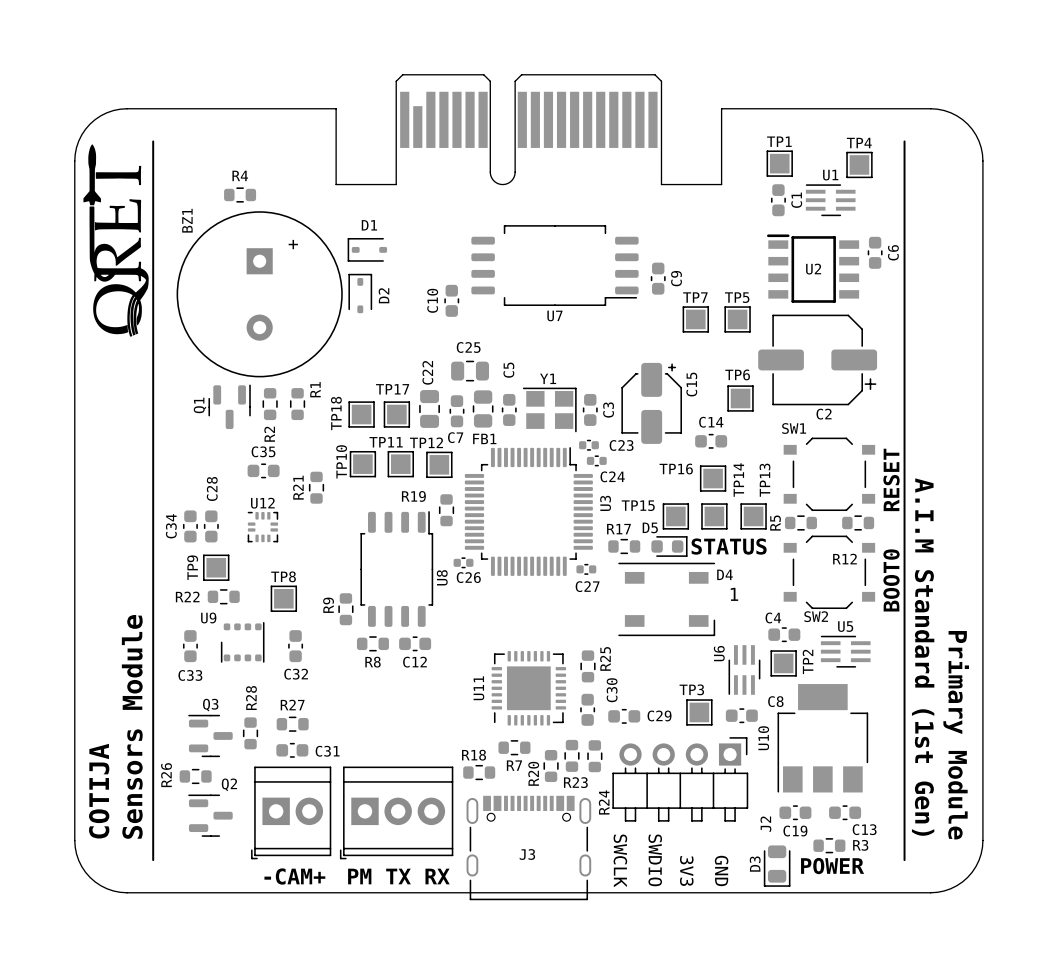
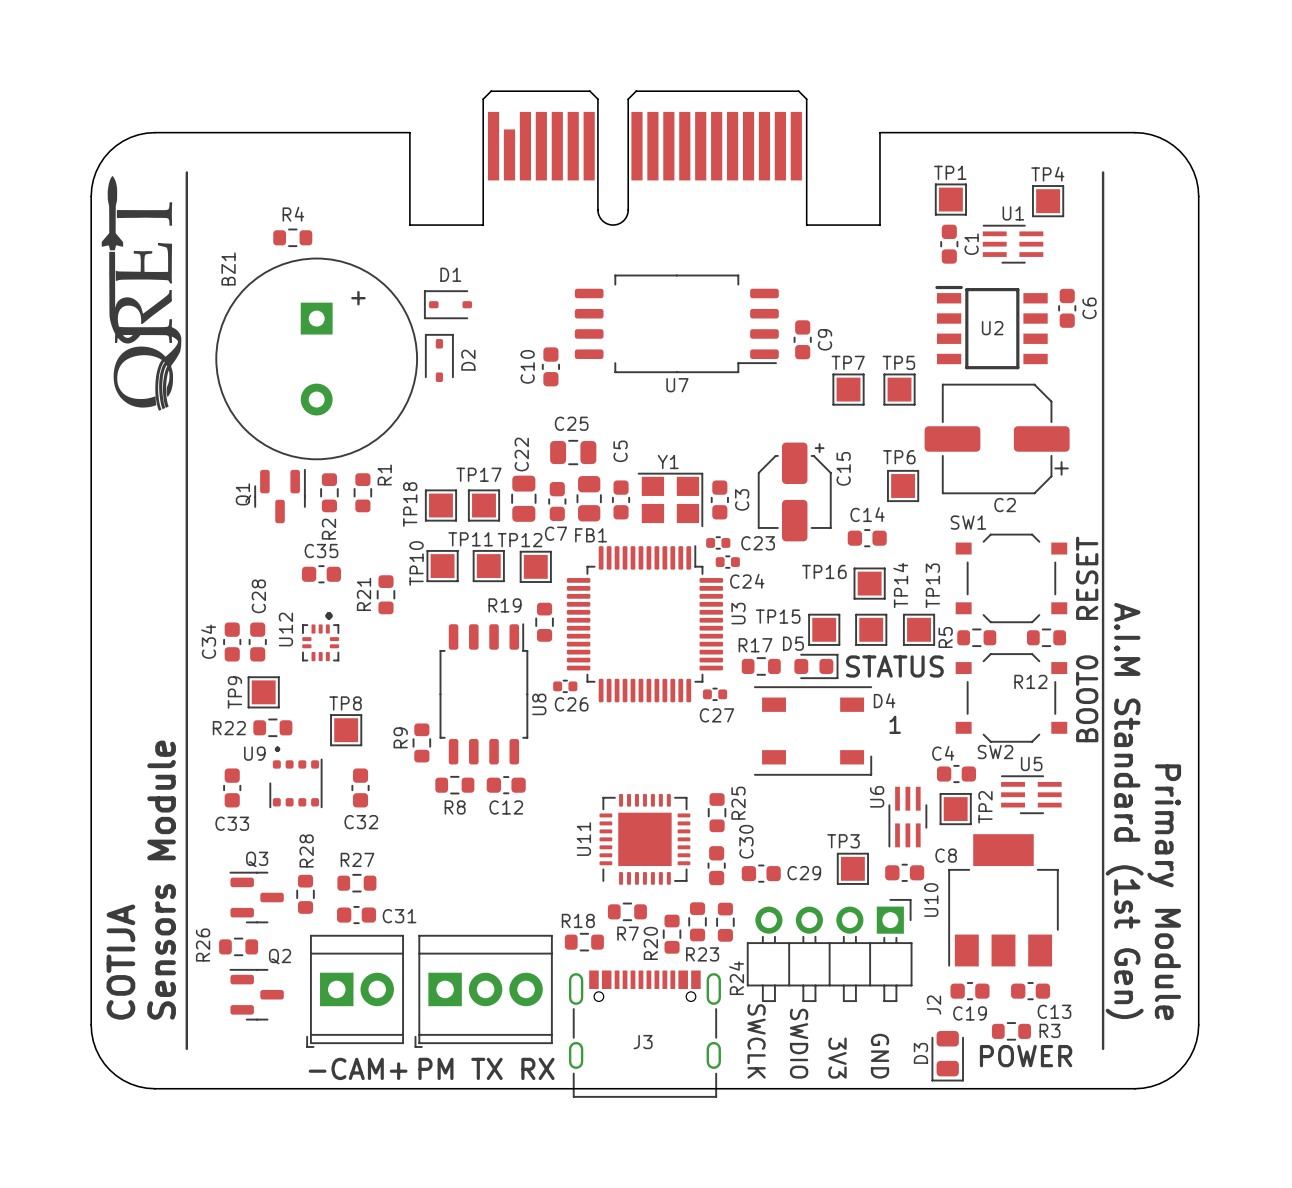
U12 name position: U12 (262, 503) -> U12 (285, 629)
U12 footprint: [247, 511, 279, 543] -> [302, 624, 340, 662]
text: none -> . (277, 749)

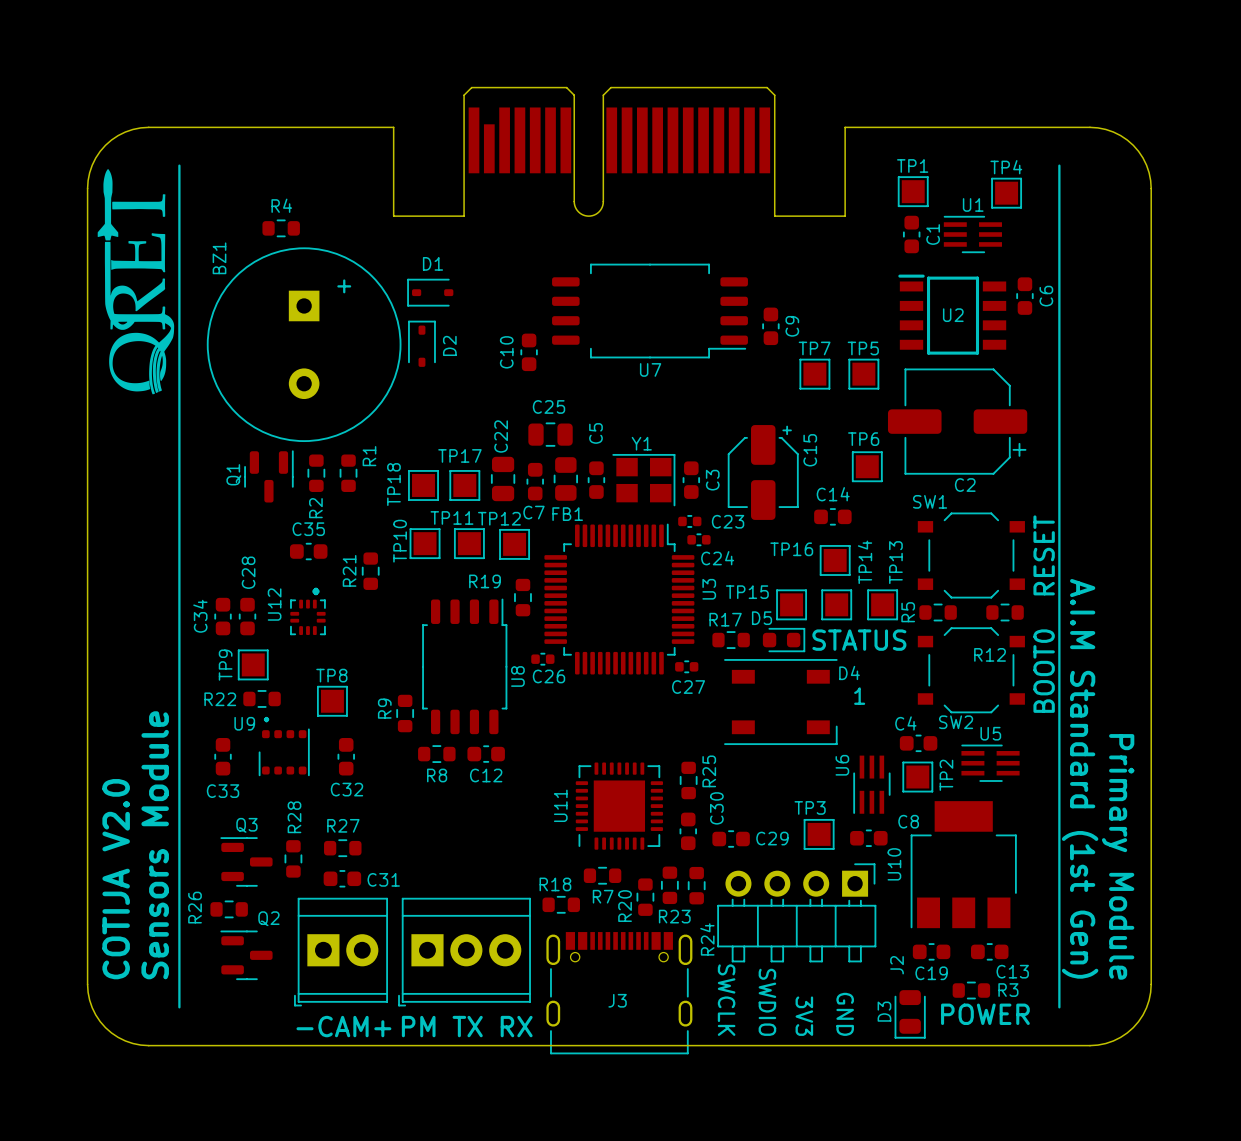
text: COTIJA (120, 962) -> COTIJA V2.0 (116, 879)

